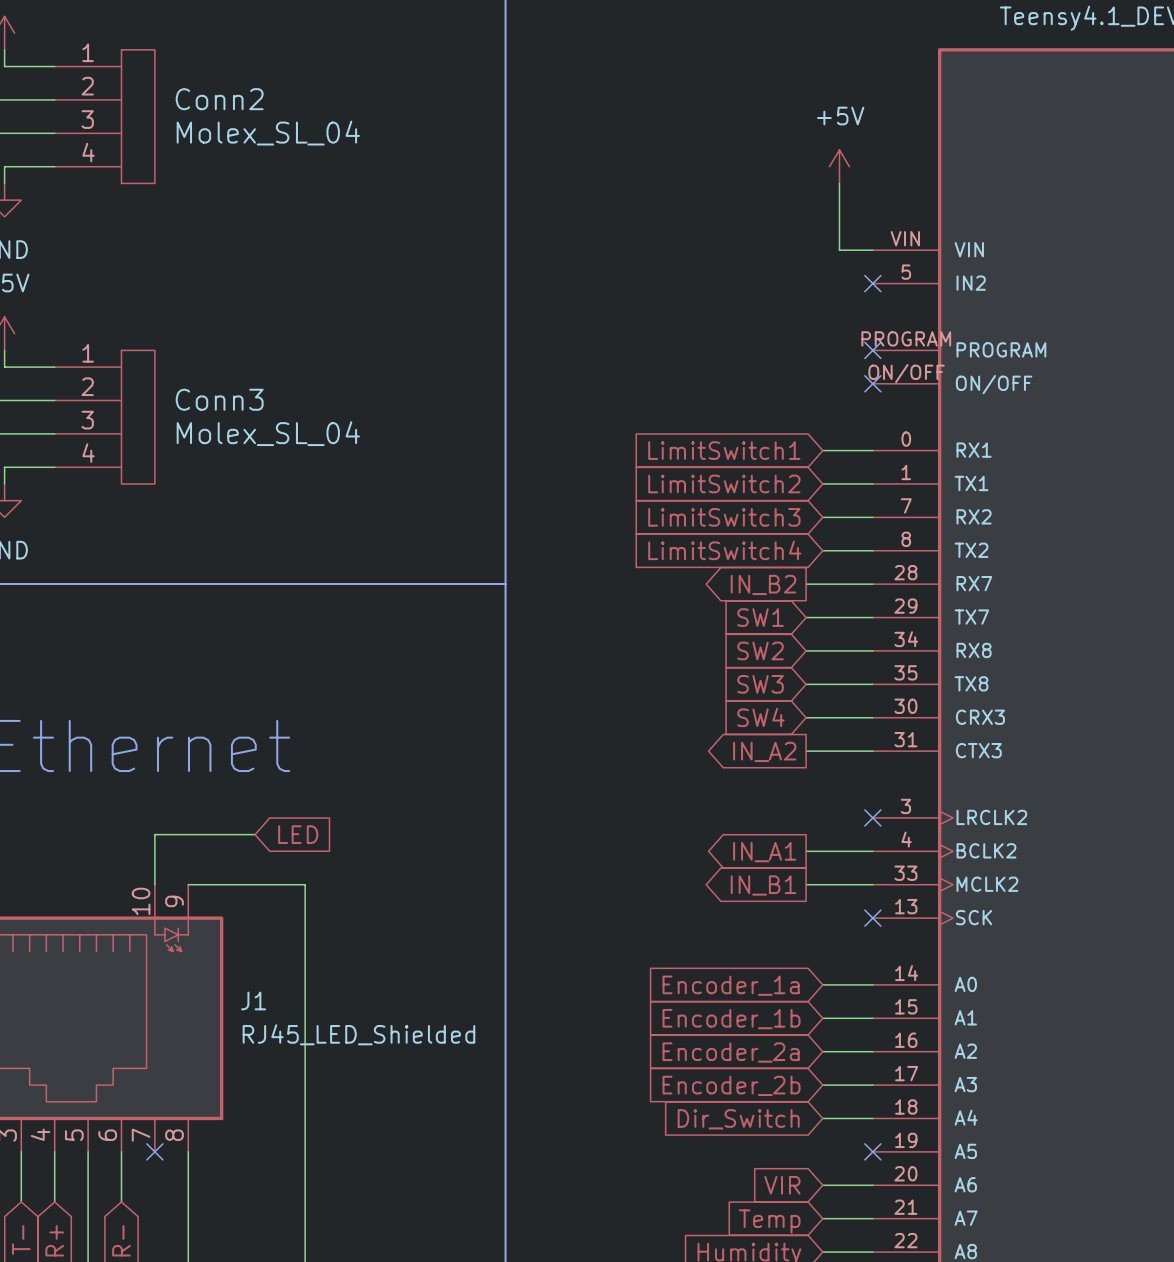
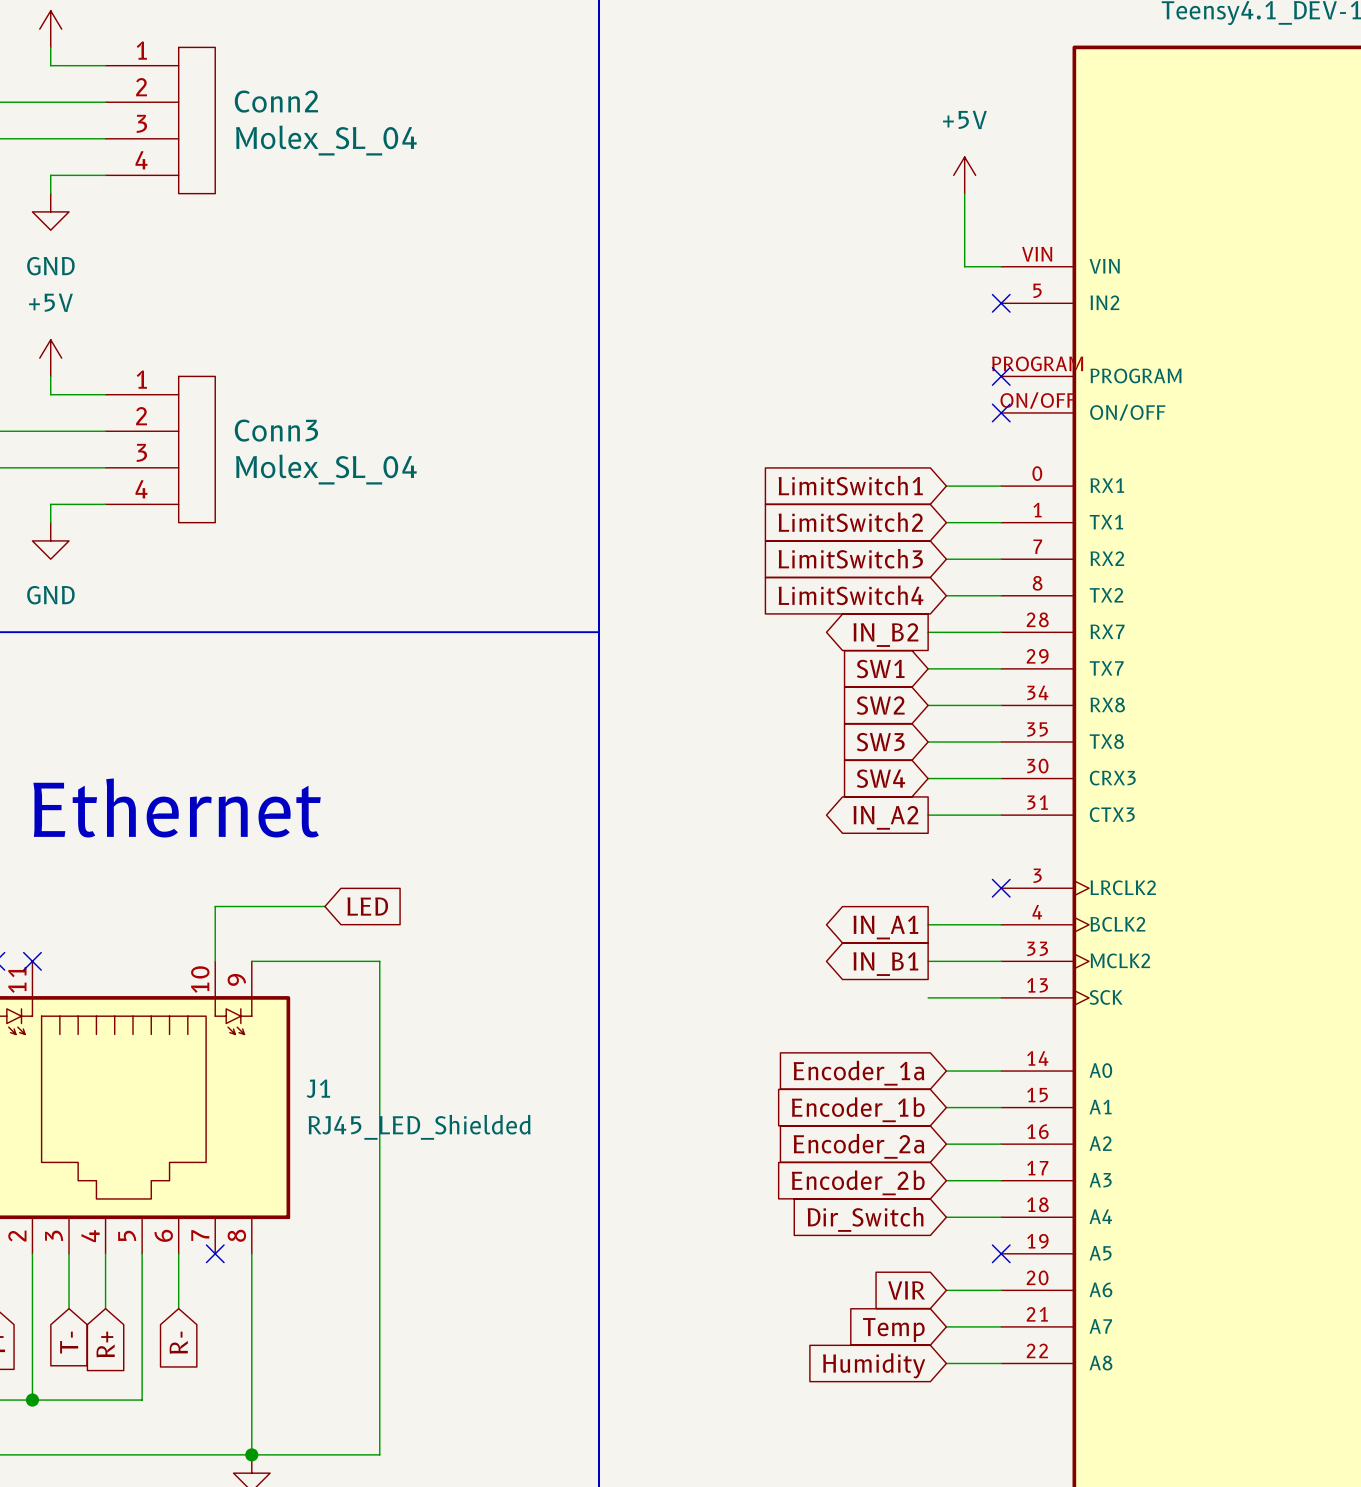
wire: none -> (928, 997) (1001, 997)
no-connect mark: (872, 918) -> none

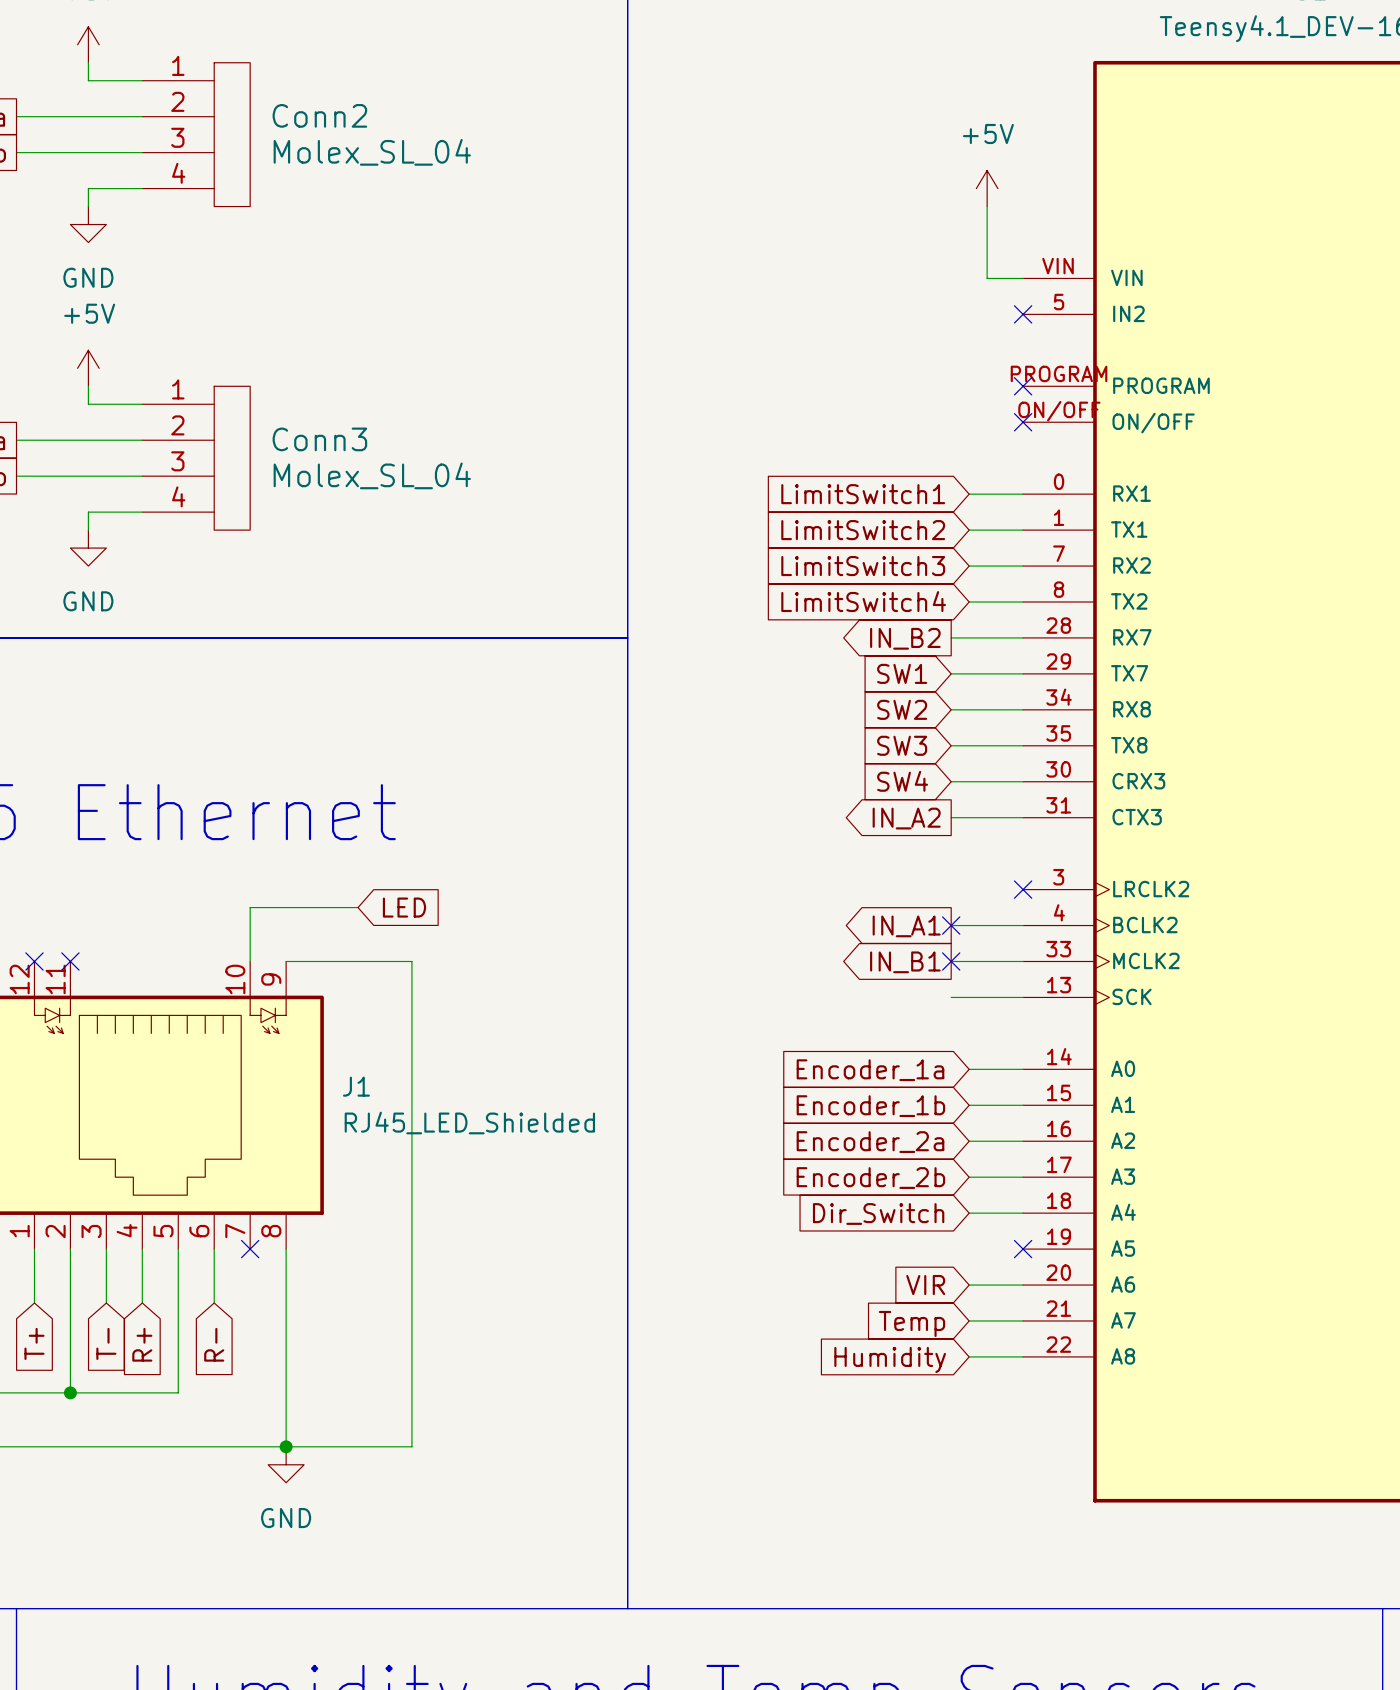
no-connect mark: none -> (951, 925)
no-connect mark: none -> (951, 961)

